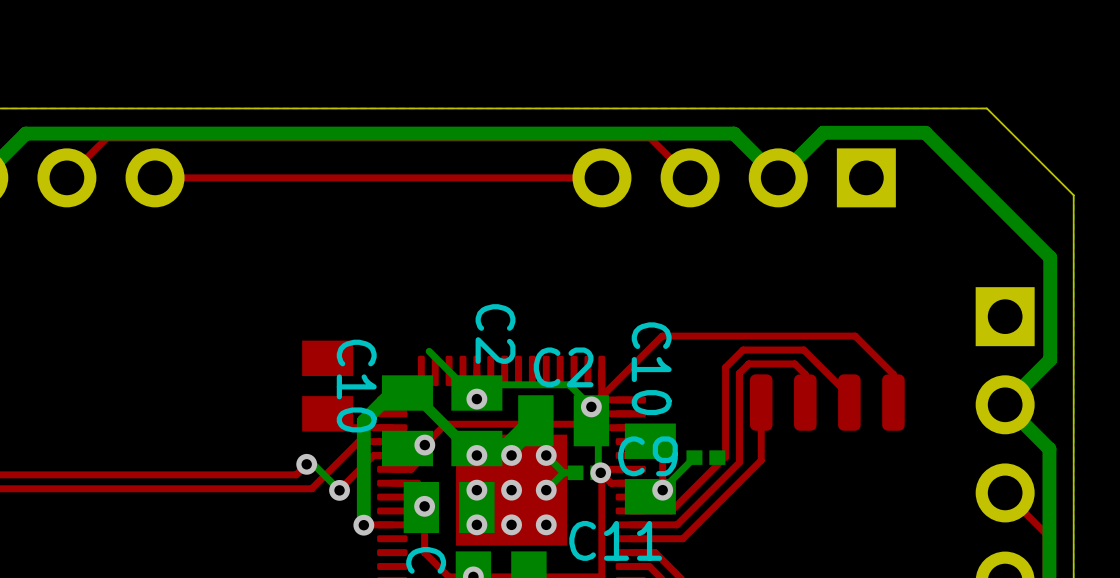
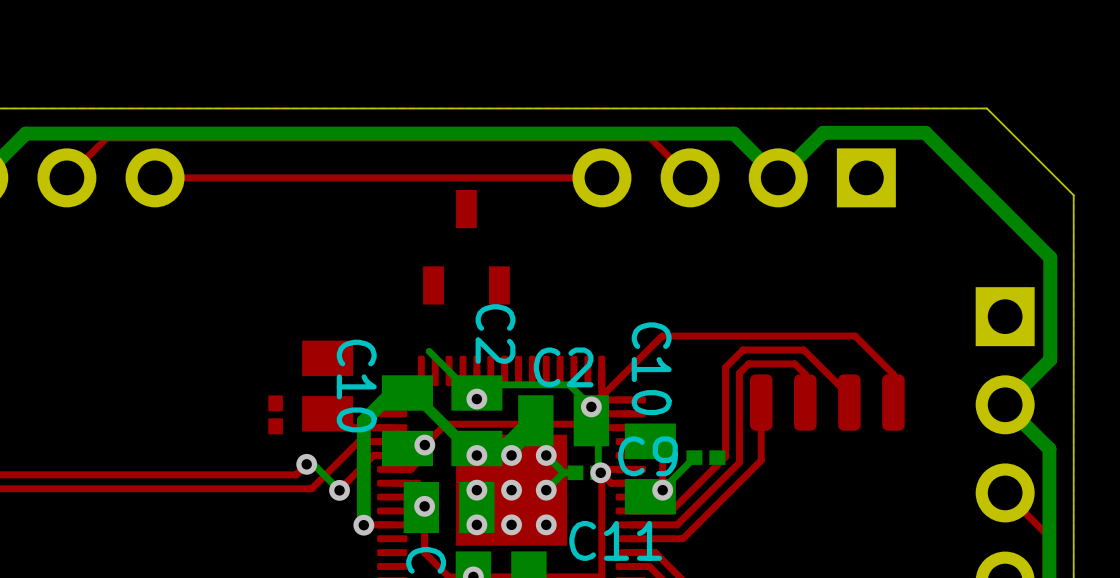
part: none -> (466, 247)
part: none -> (275, 414)

